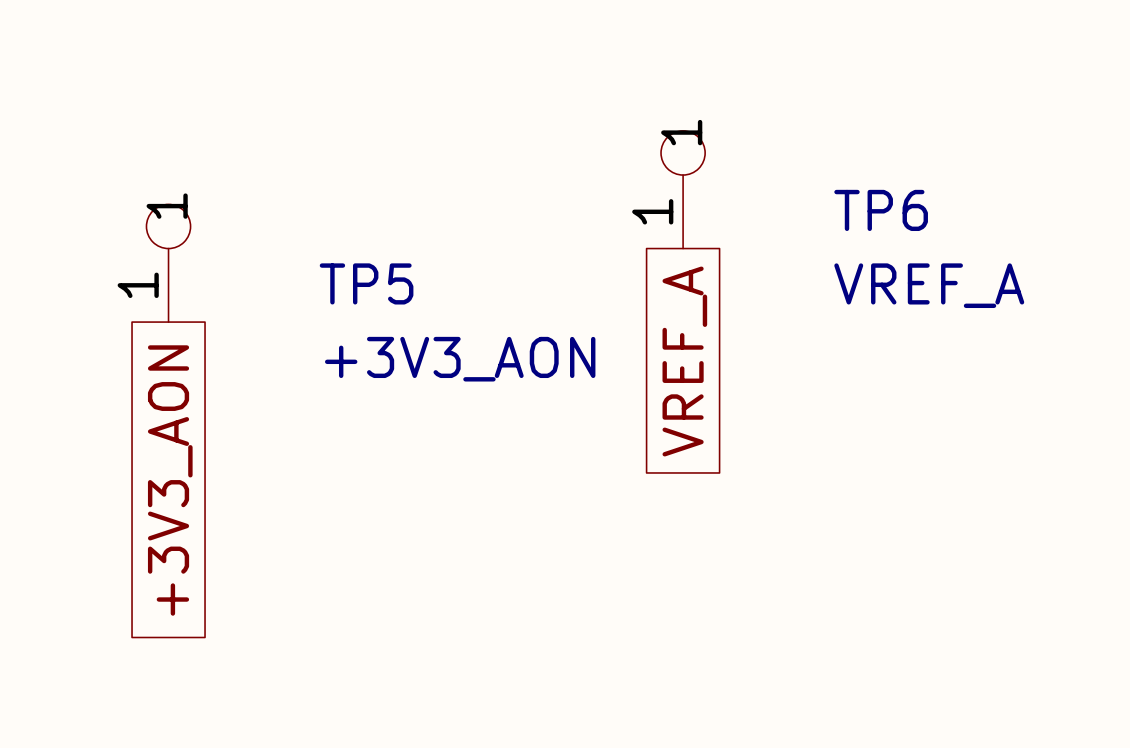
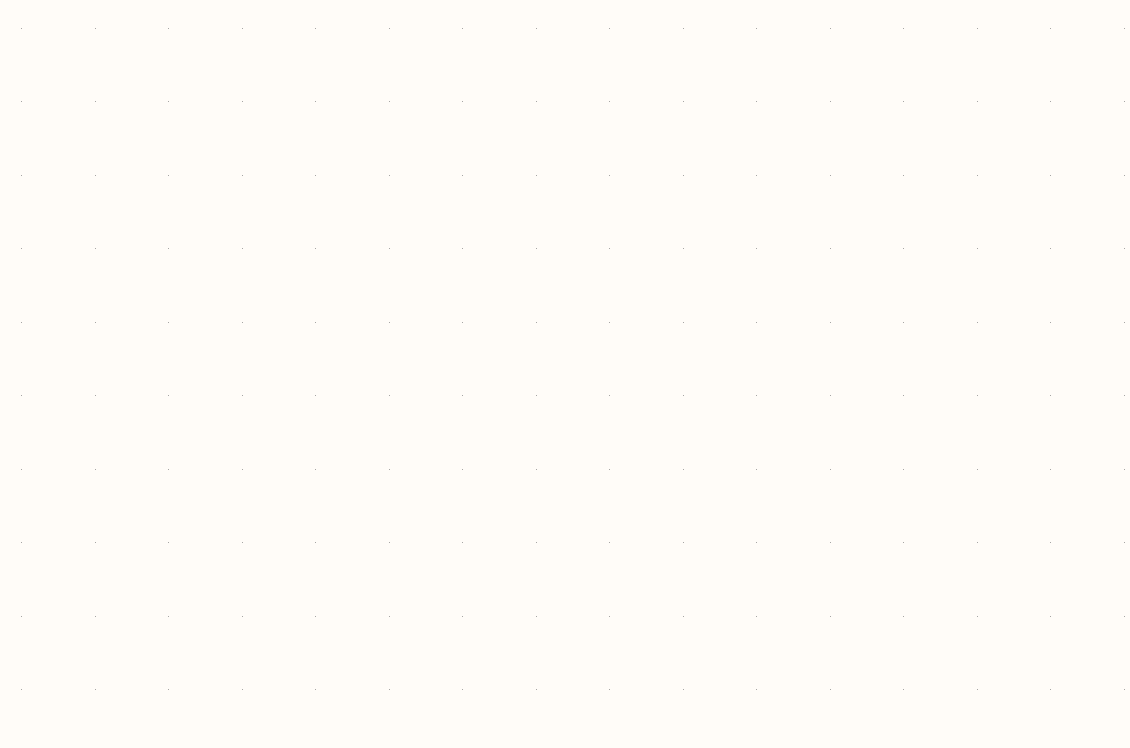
TP6: VREF_A (683, 189) -> none
TP5: +3V3_AON (168, 263) -> none
global label: VREF_A (684, 361) -> none
global label: +3V3_AON (170, 480) -> none

